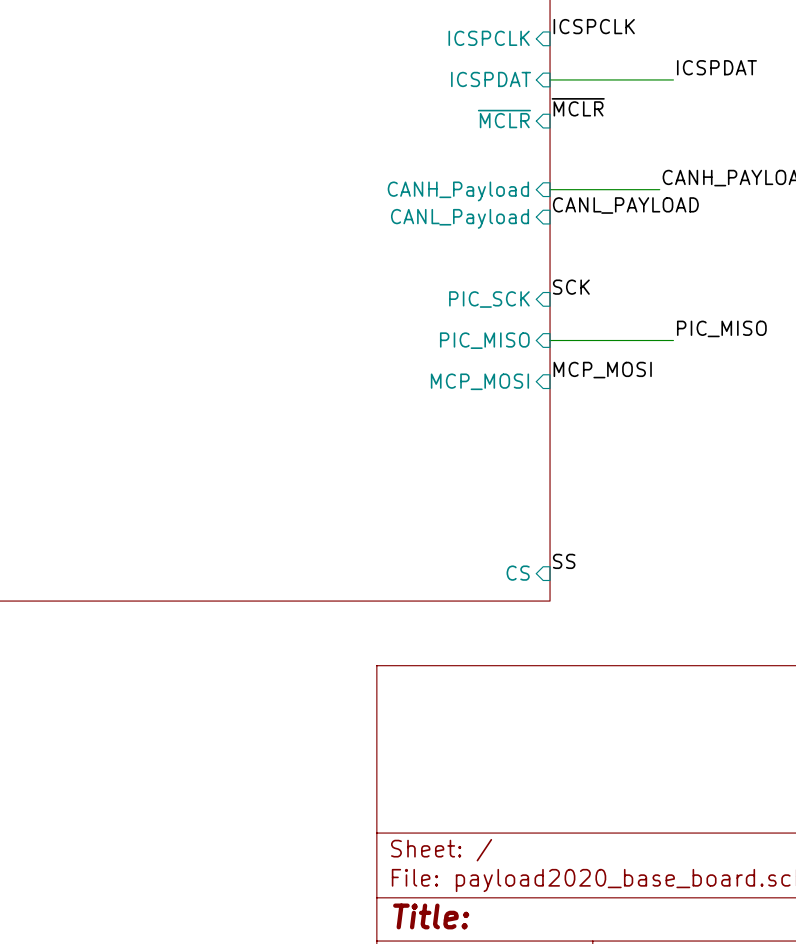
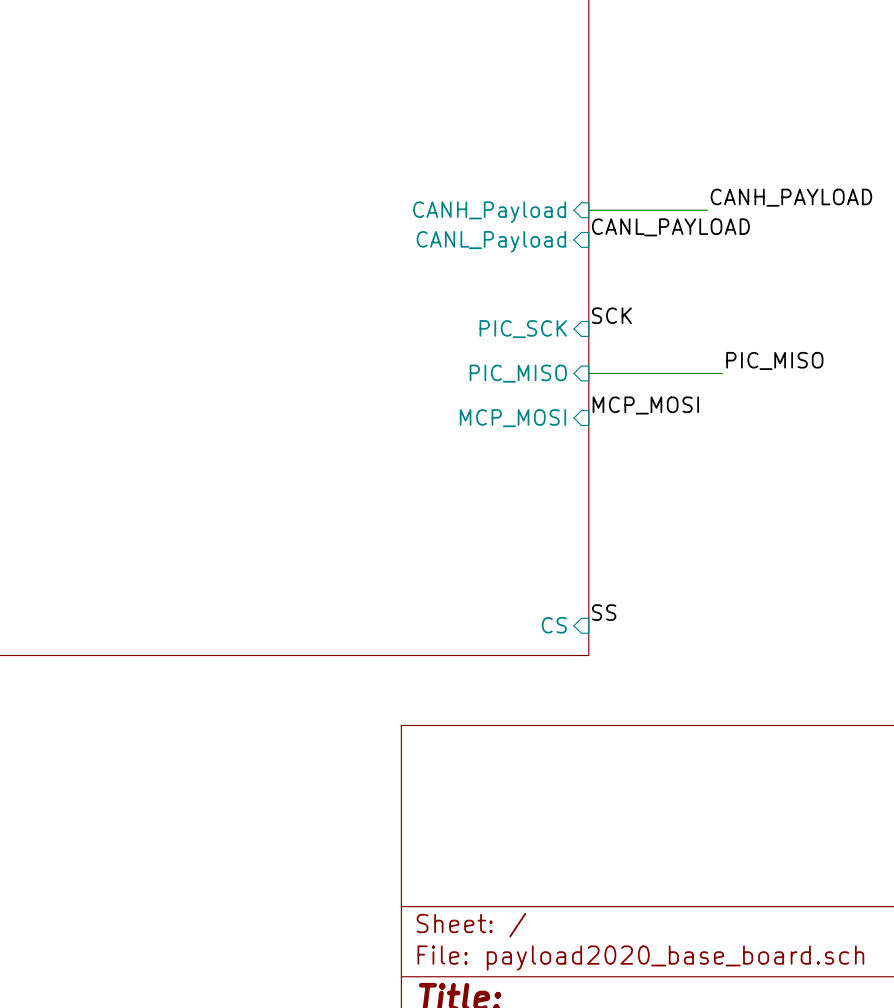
label: ICSPCLK (594, 26) -> none
sheet pin: ICSPCLK (489, 38) -> none
label: ICSPDAT (716, 67) -> none
sheet pin: ICSPDAT (491, 79) -> none
wire: (550, 79) (673, 79) -> none
label: ~{MCLR} (578, 107) -> none
sheet pin: ~{MCLR} (504, 119) -> none

